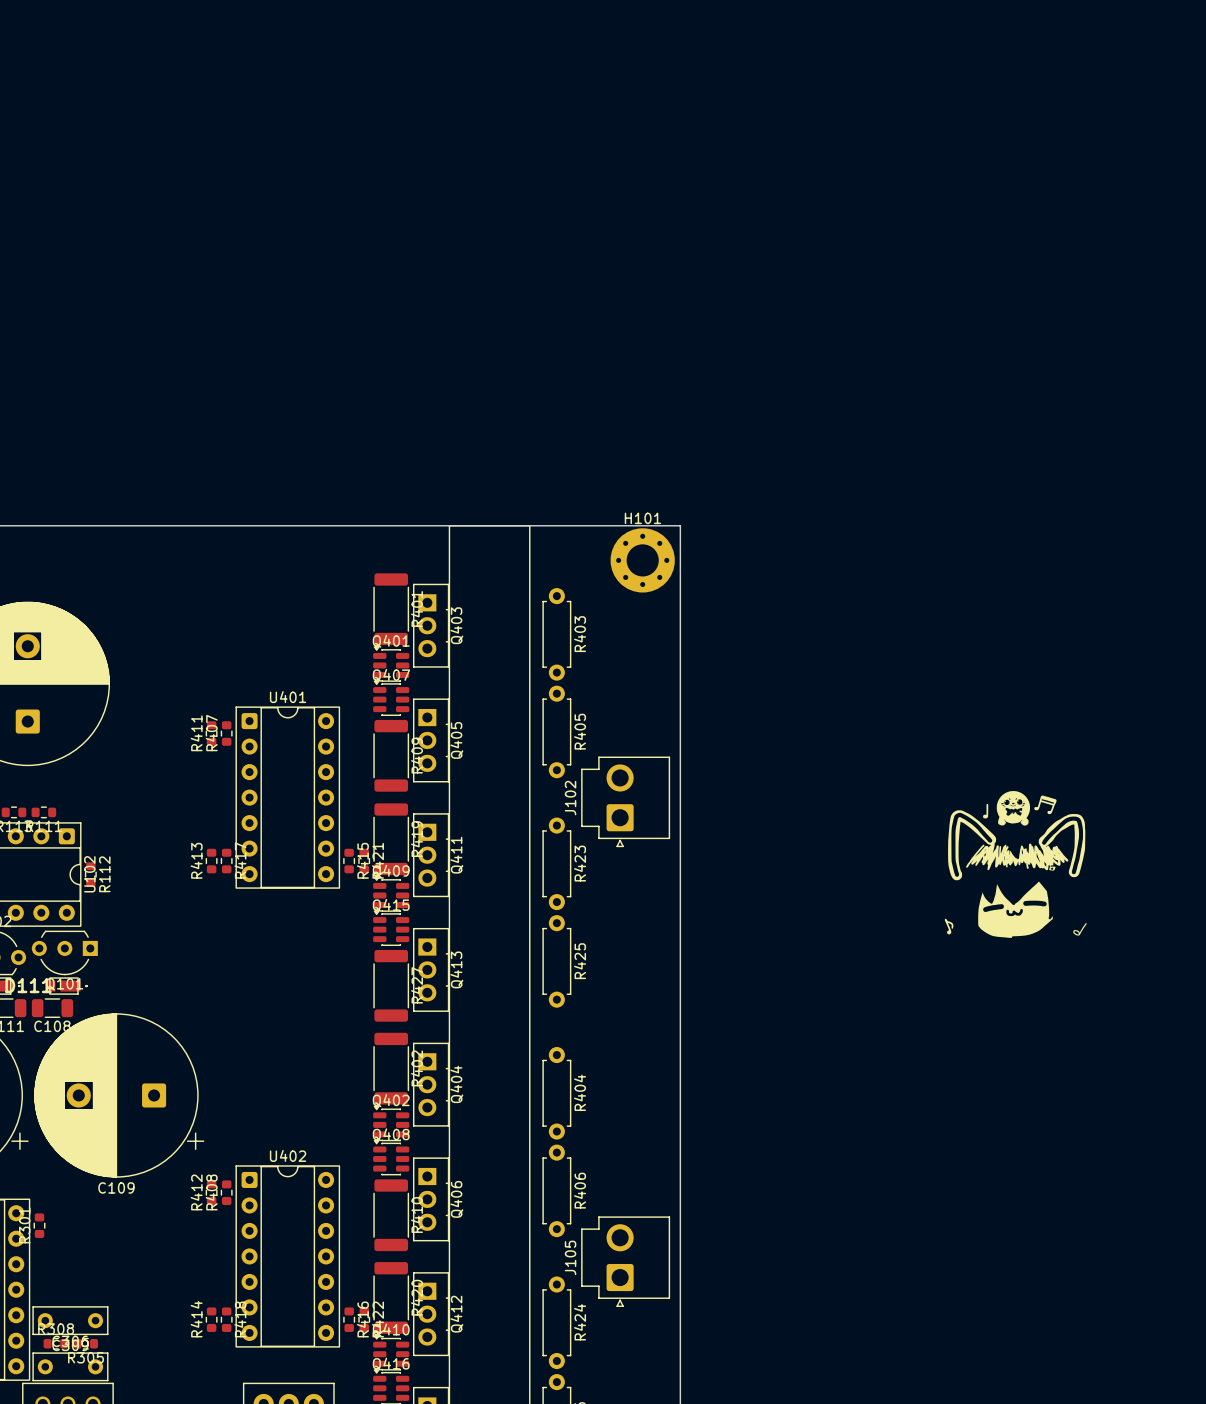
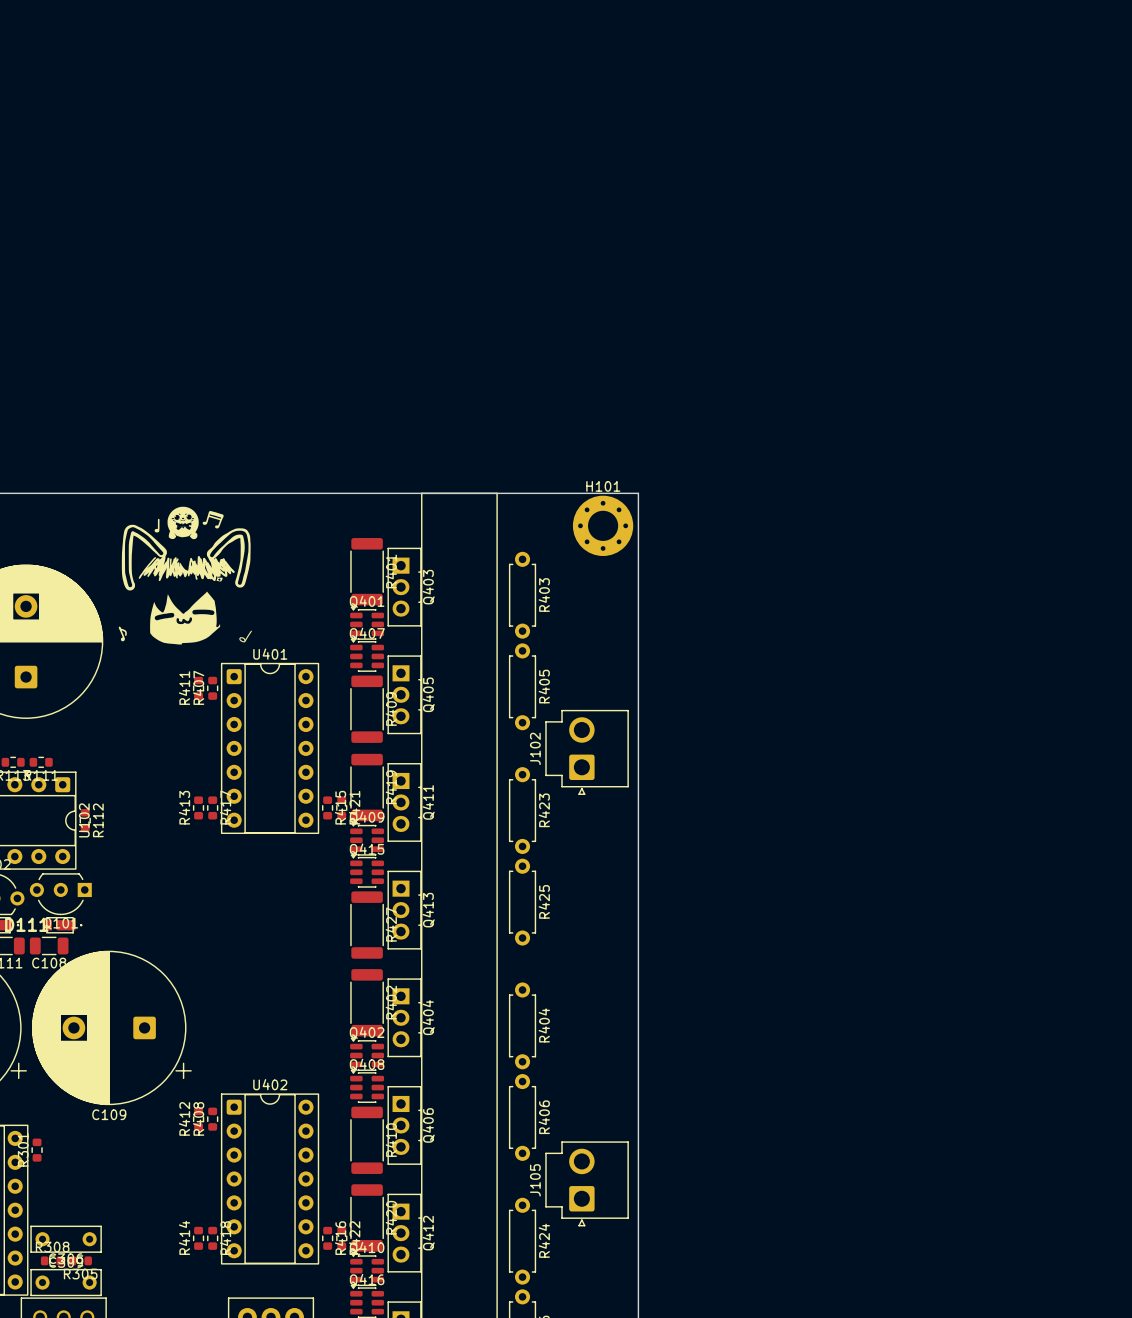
drawing: none -> [115, 506, 254, 646]
drawing: [941, 790, 1089, 940] -> none

